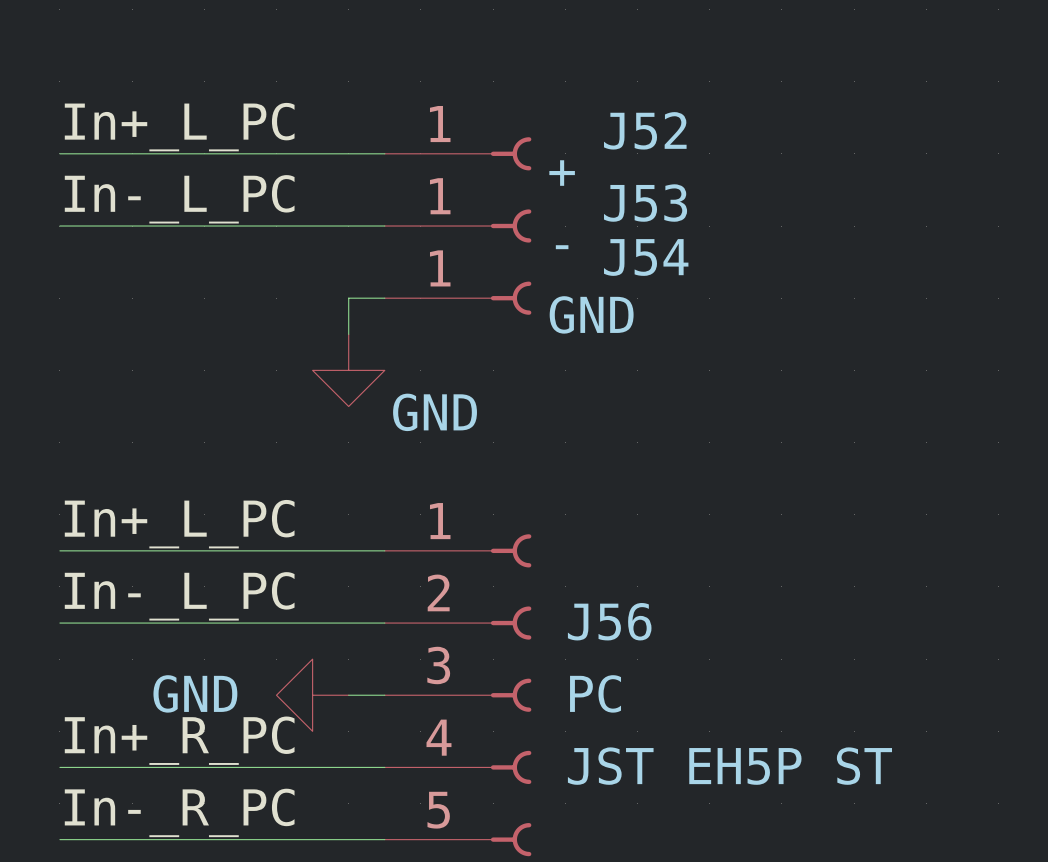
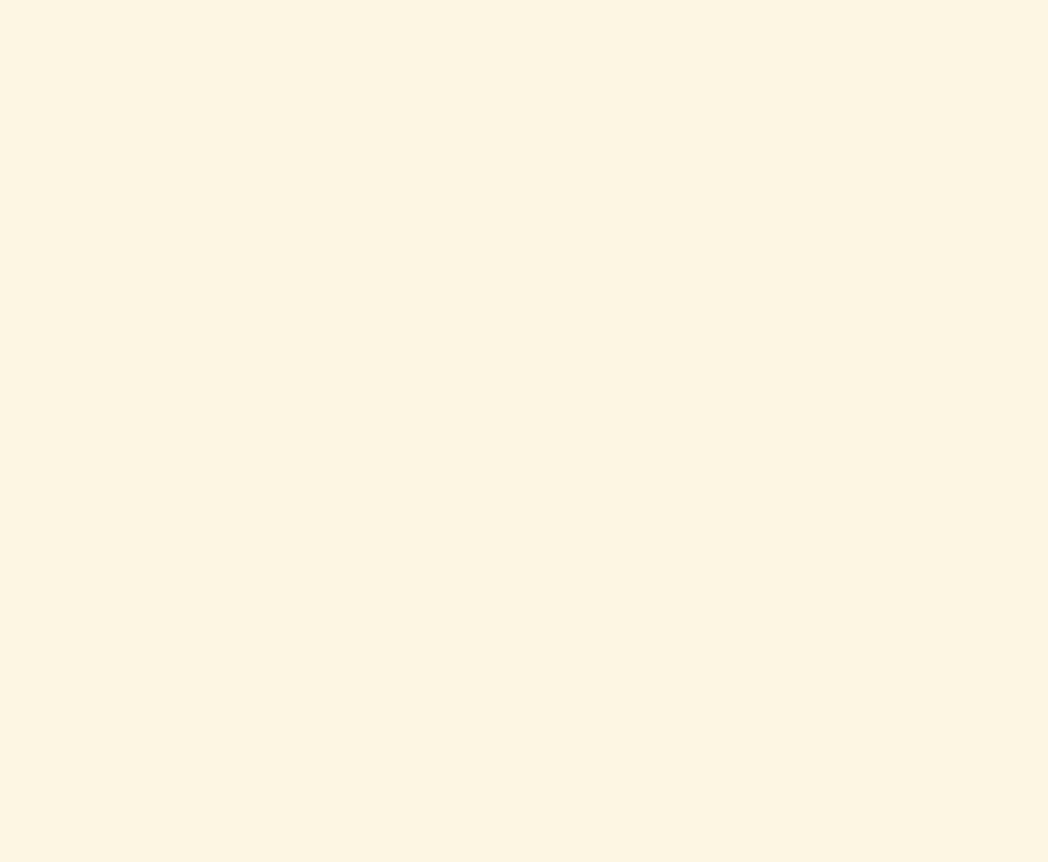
label: In+_L_PC (179, 127) -> none
wire: (59, 153) (384, 153) -> none
J52: + (458, 153) -> none
label: In-_L_PC (179, 199) -> none
wire: (59, 226) (384, 226) -> none
J53: - (458, 226) -> none
wire: (384, 298) (348, 298) (348, 334) -> none
J54: GND (458, 298) -> none
power symbol: GND (348, 370) -> none
label: In+_L_PC (179, 524) -> none
wire: (59, 550) (384, 550) -> none
label: In-_L_PC (179, 596) -> none
wire: (59, 623) (384, 623) -> none
power symbol: GND (312, 695) -> none
wire: (348, 695) (384, 695) -> none
J56: PC (458, 695) -> none
label: In+_R_PC (179, 740) -> none
wire: (59, 767) (384, 767) -> none
label: In-_R_PC (179, 812) -> none
wire: (59, 839) (384, 839) -> none

